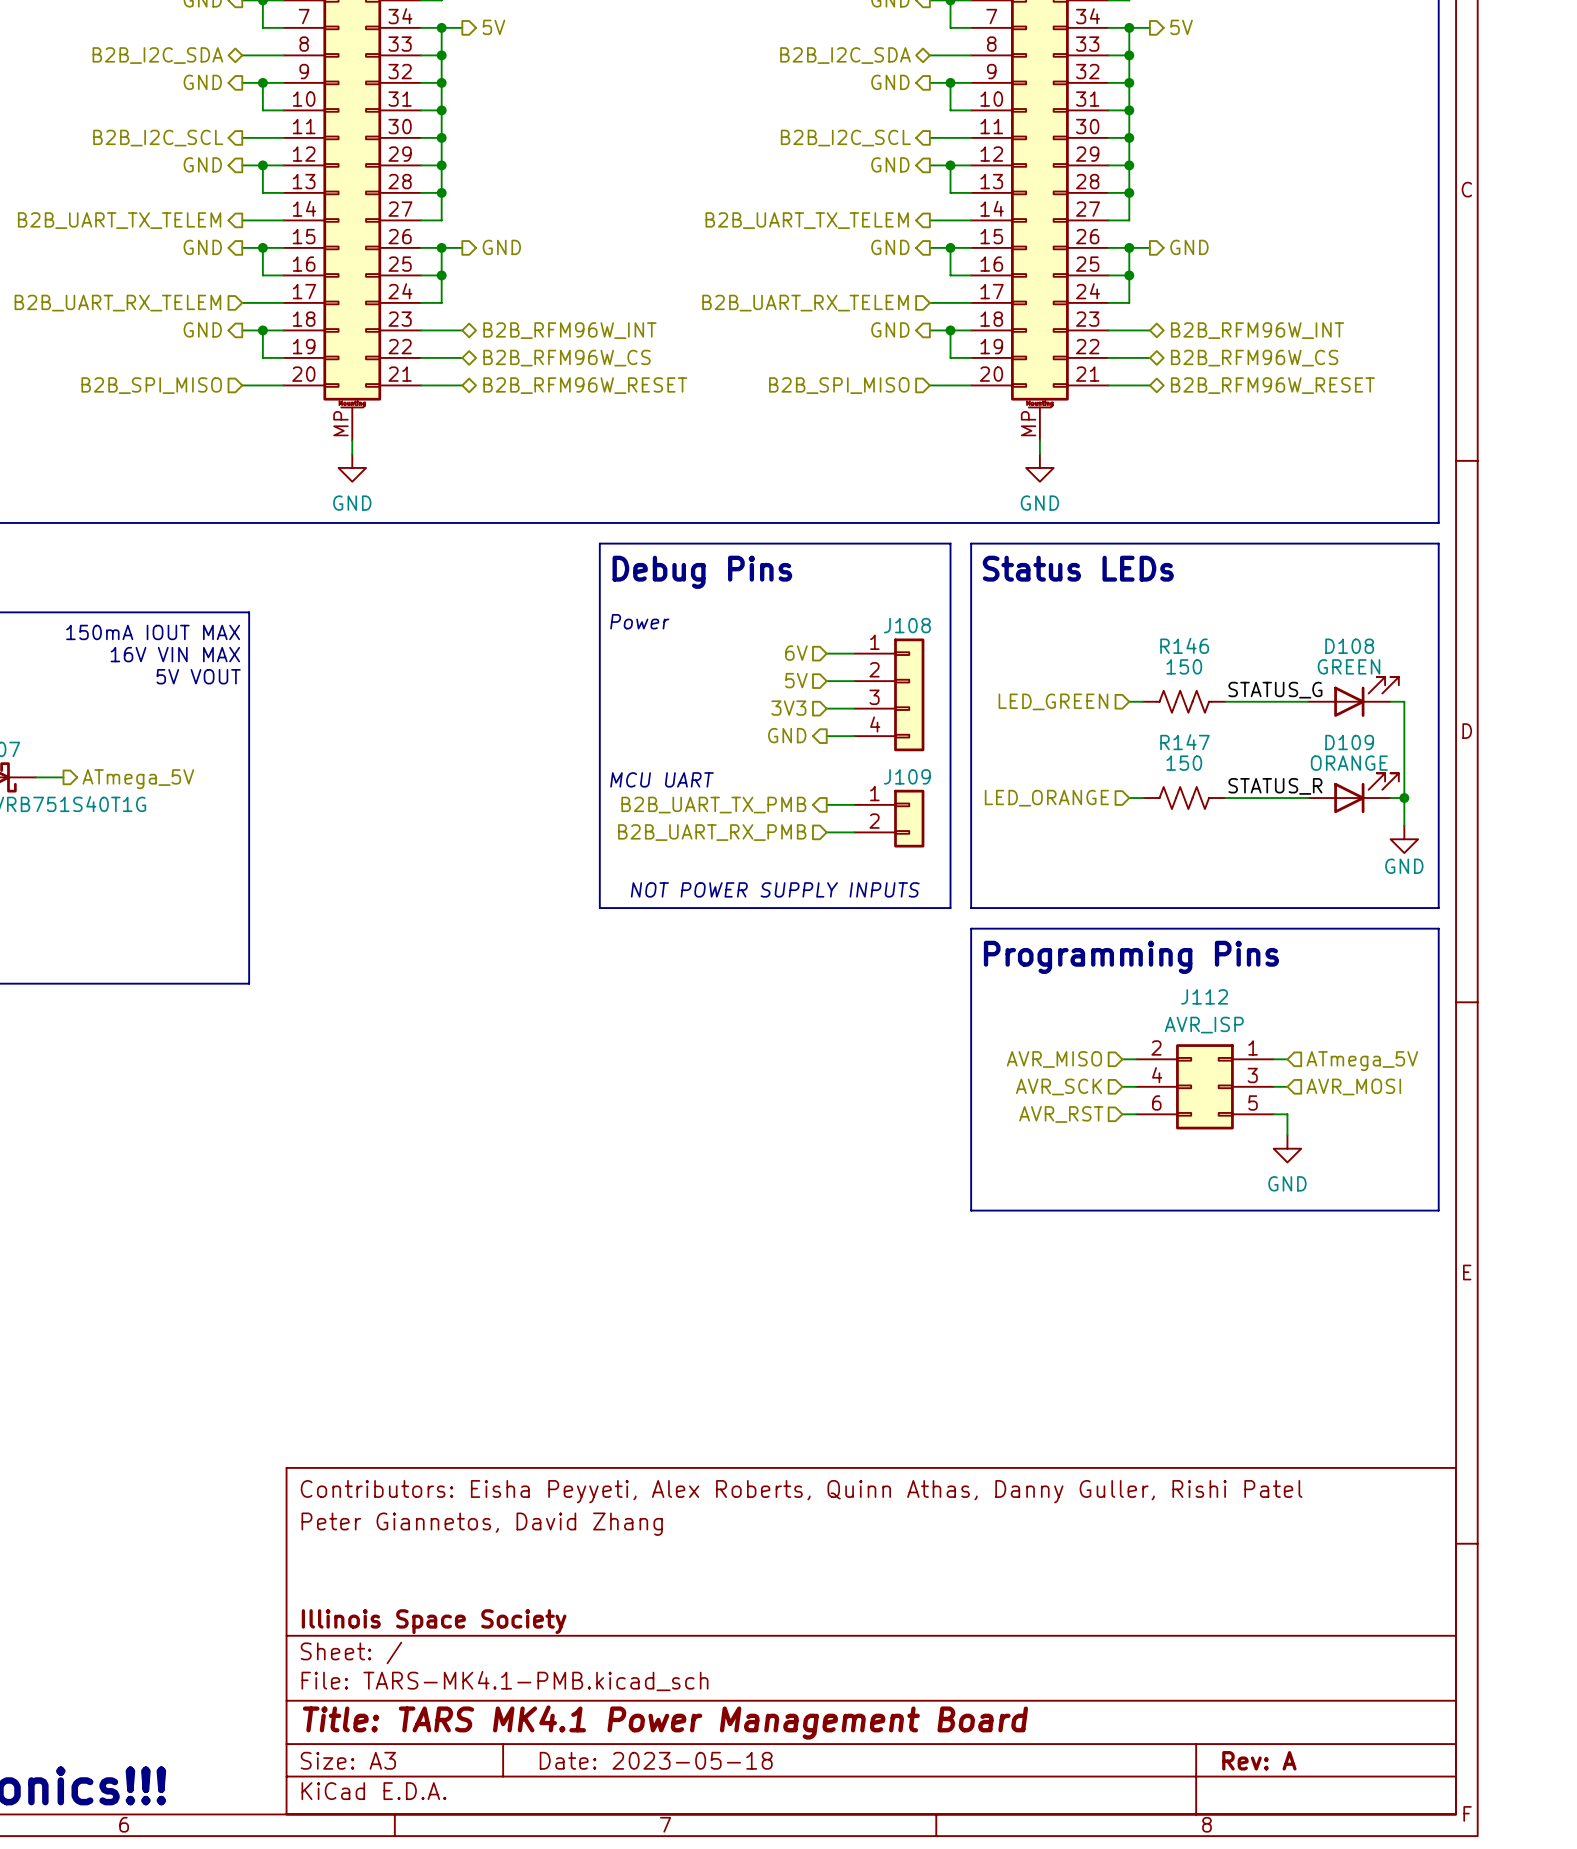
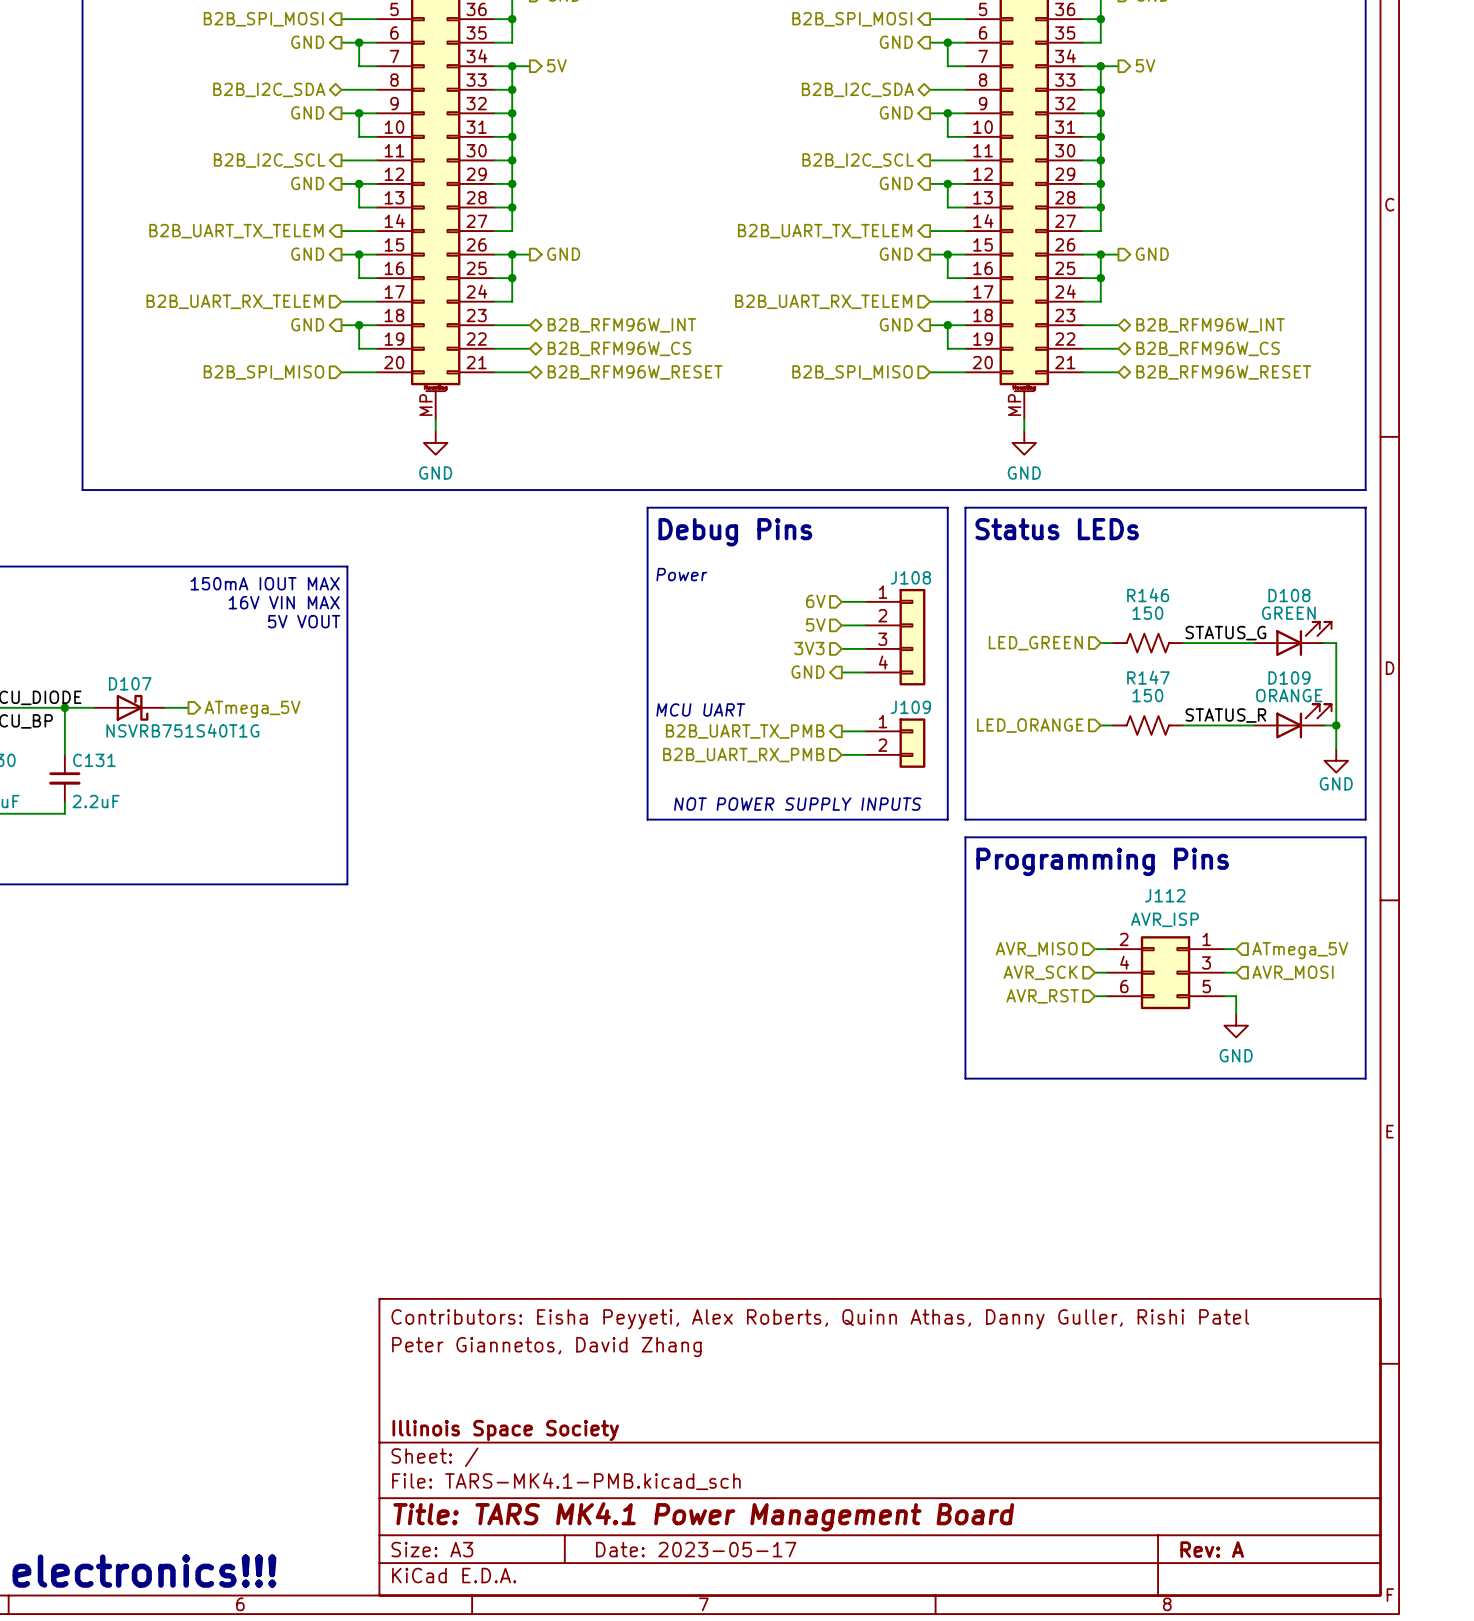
title block: Date: 2023-05-18 (656, 1760) -> Date: 2023-05-17 (696, 1549)

